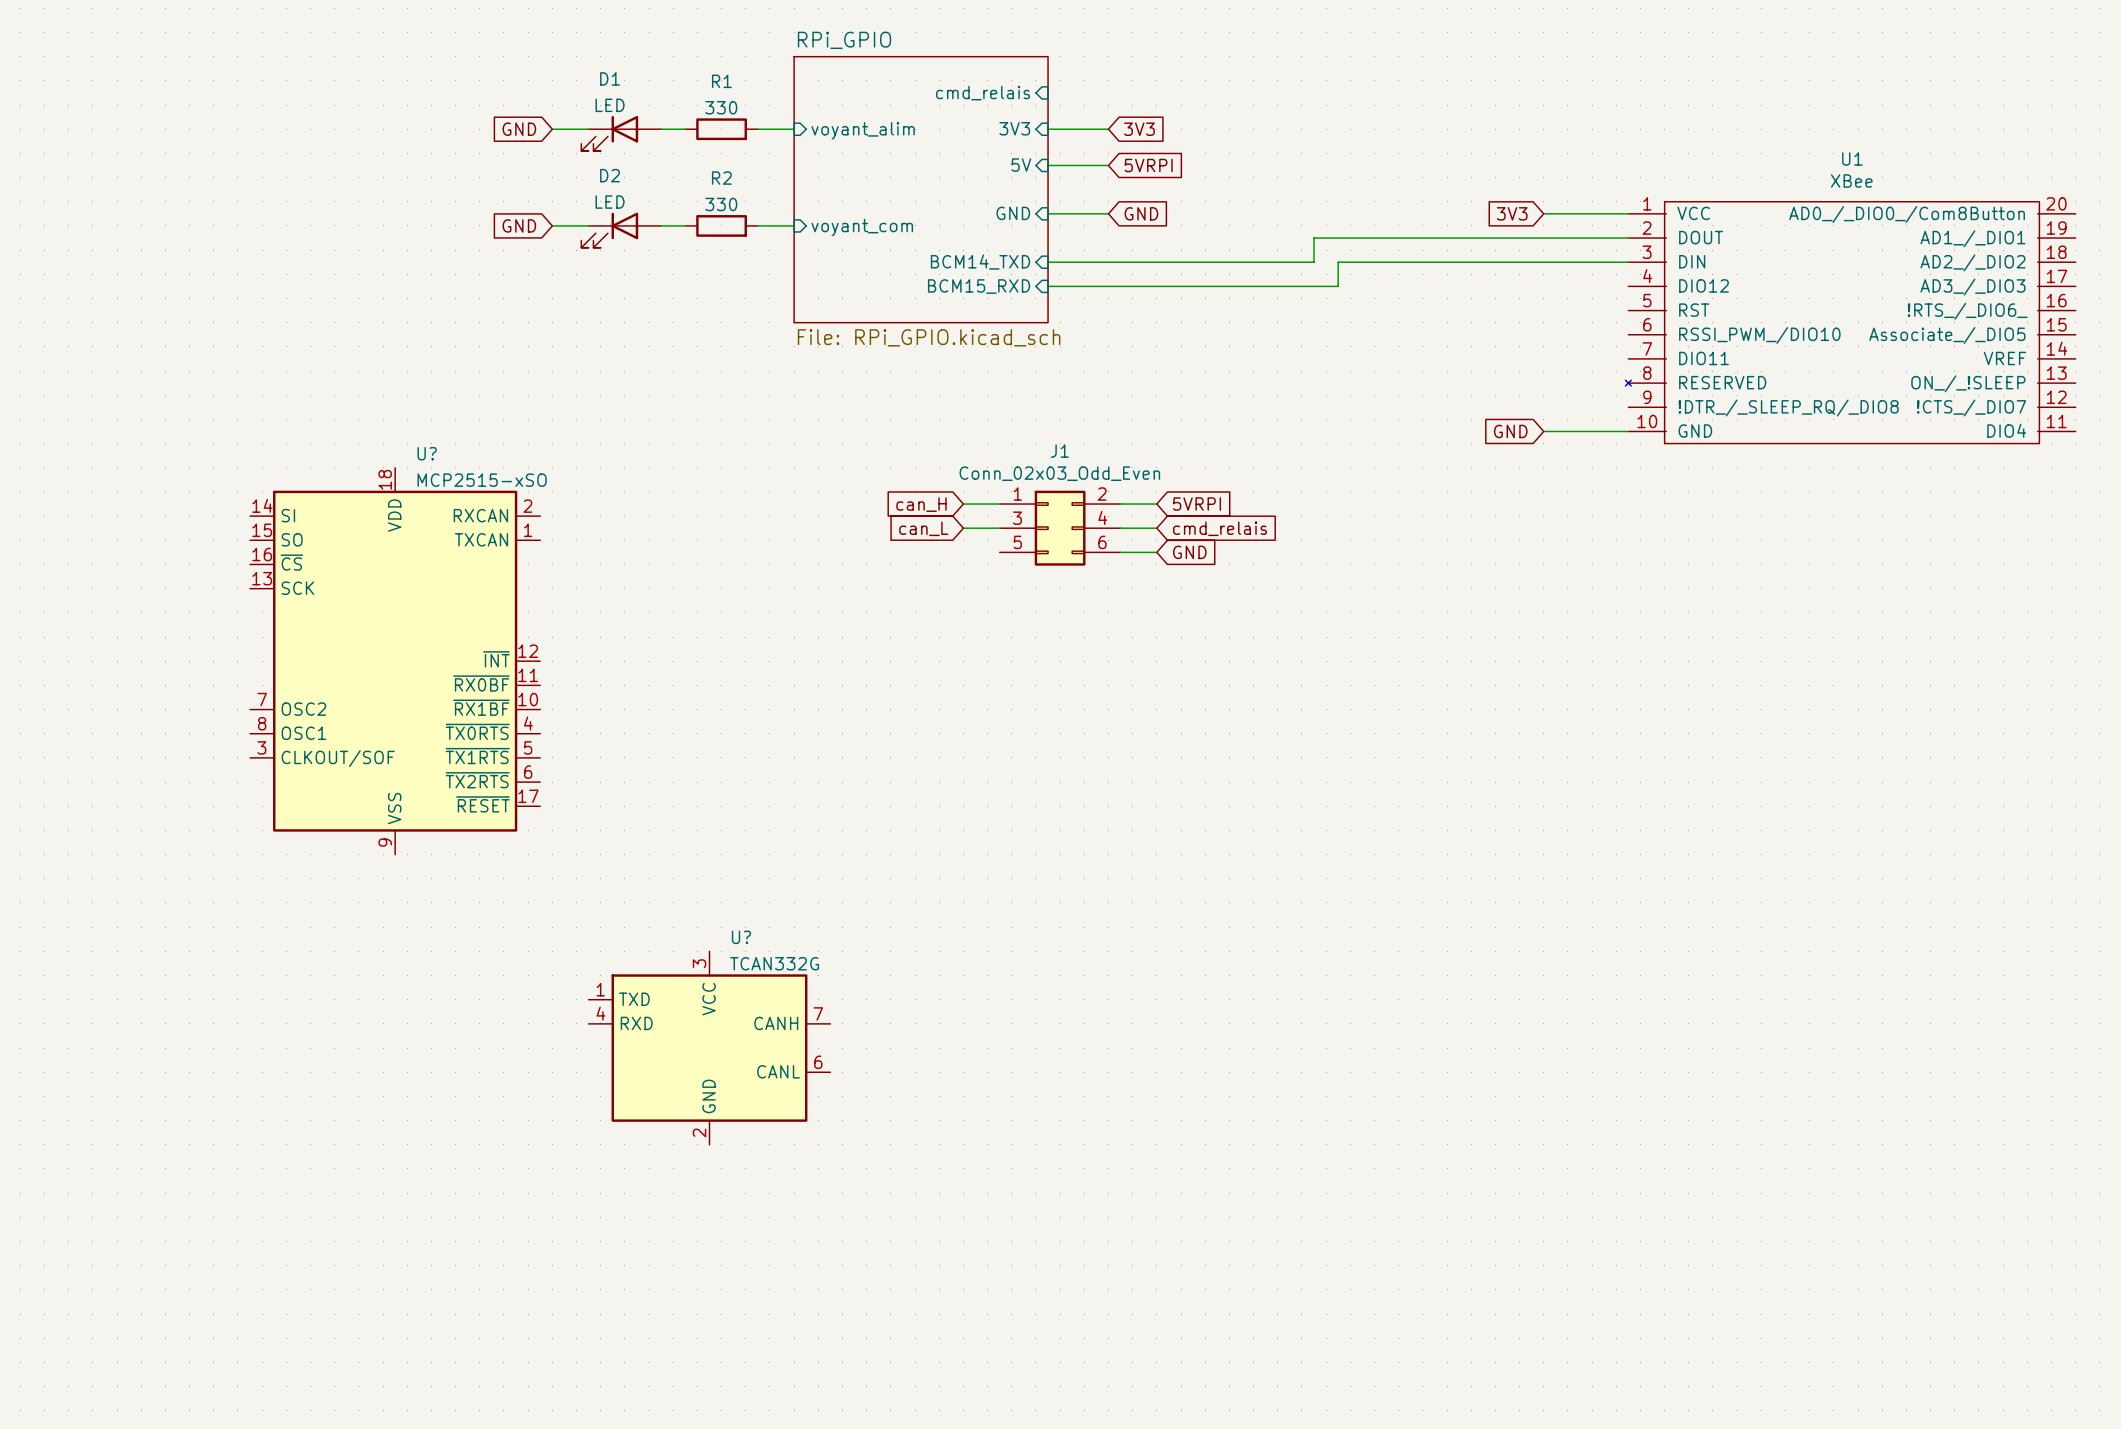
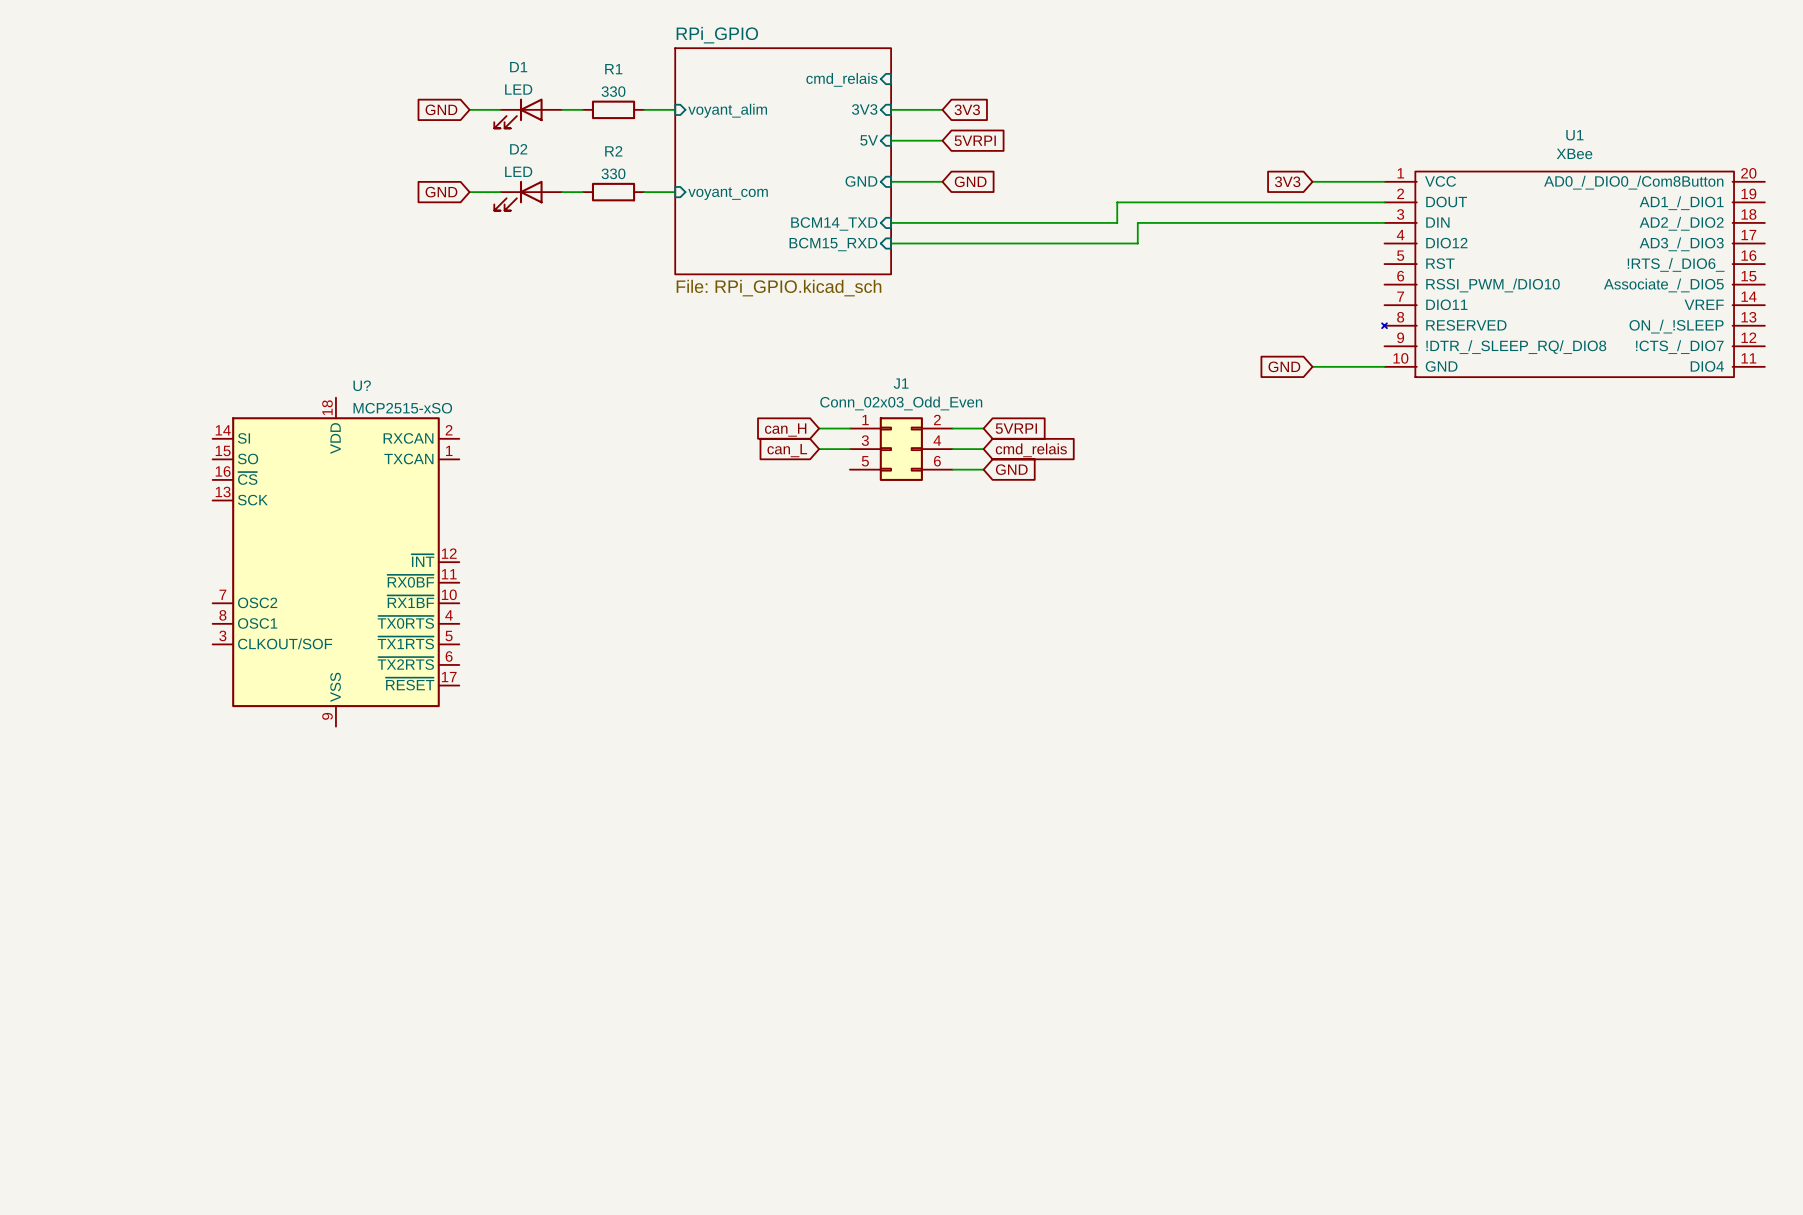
U?: TCAN332G (709, 1048) -> none

